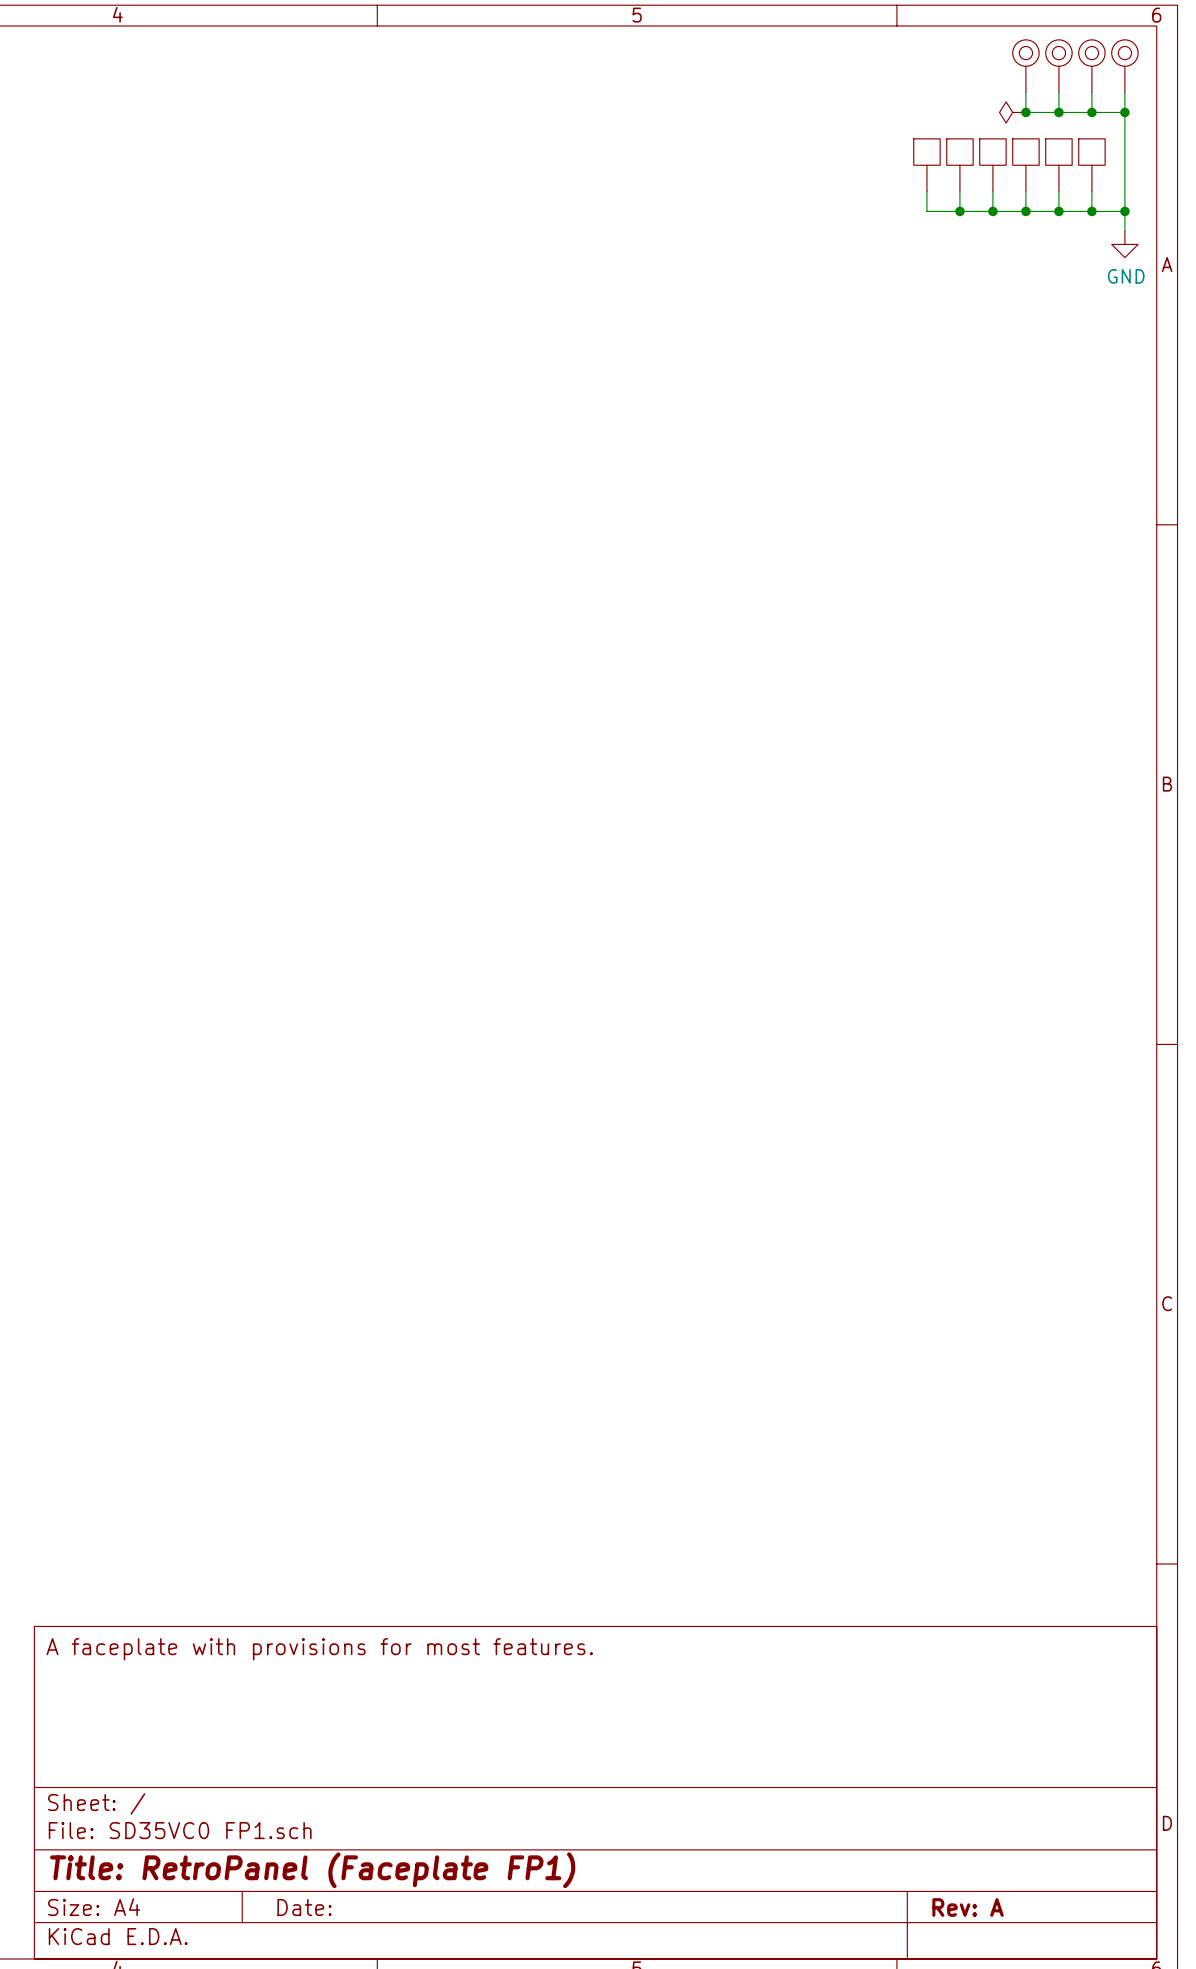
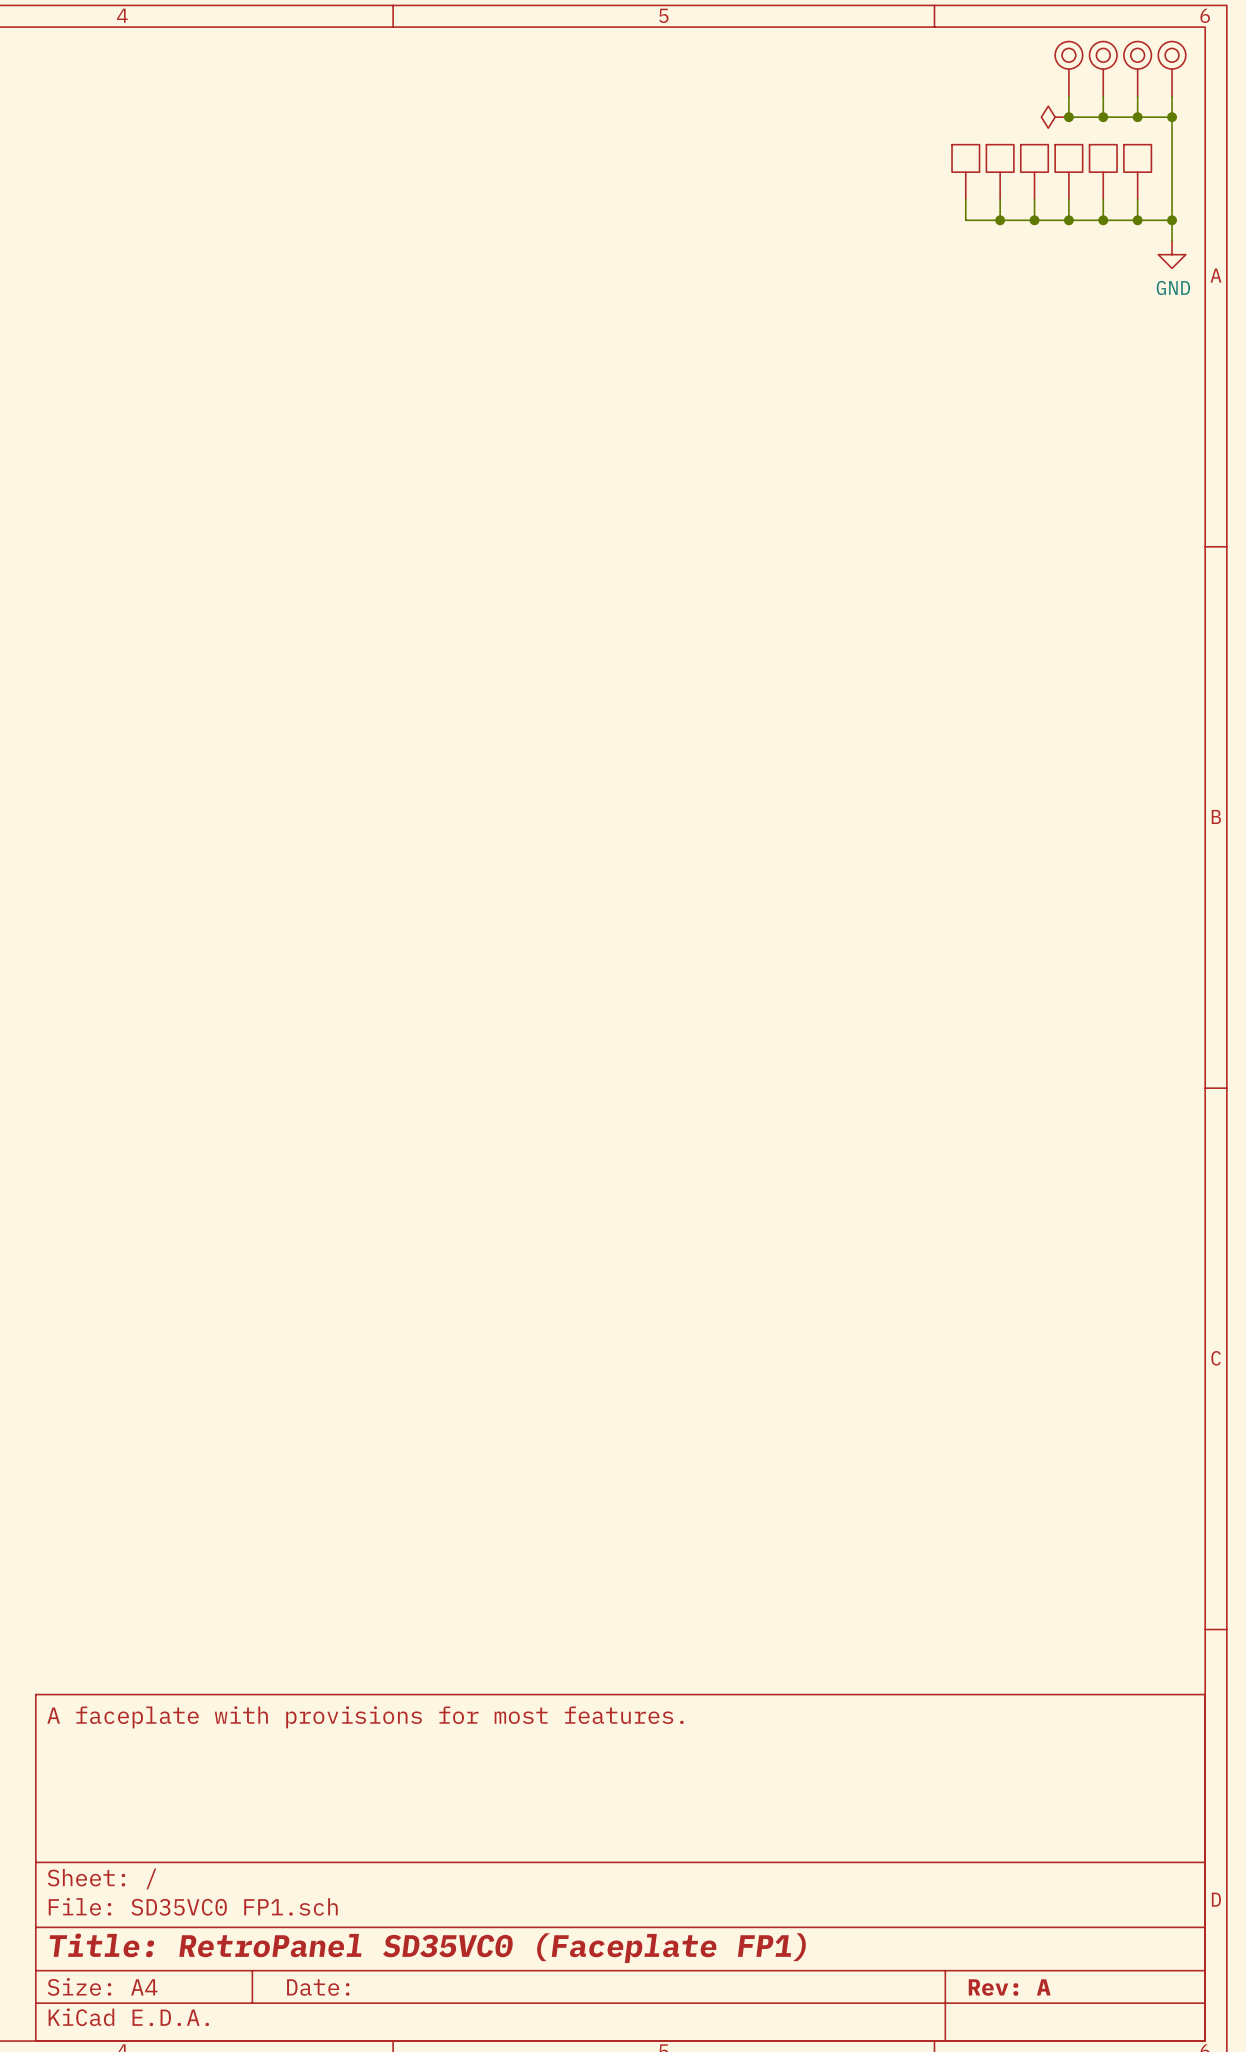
title block: Title: RetroPanel (Faceplate FP1) (312, 1870) -> Title: RetroPanel SD35VC0 (Faceplate FP1) (427, 1948)

